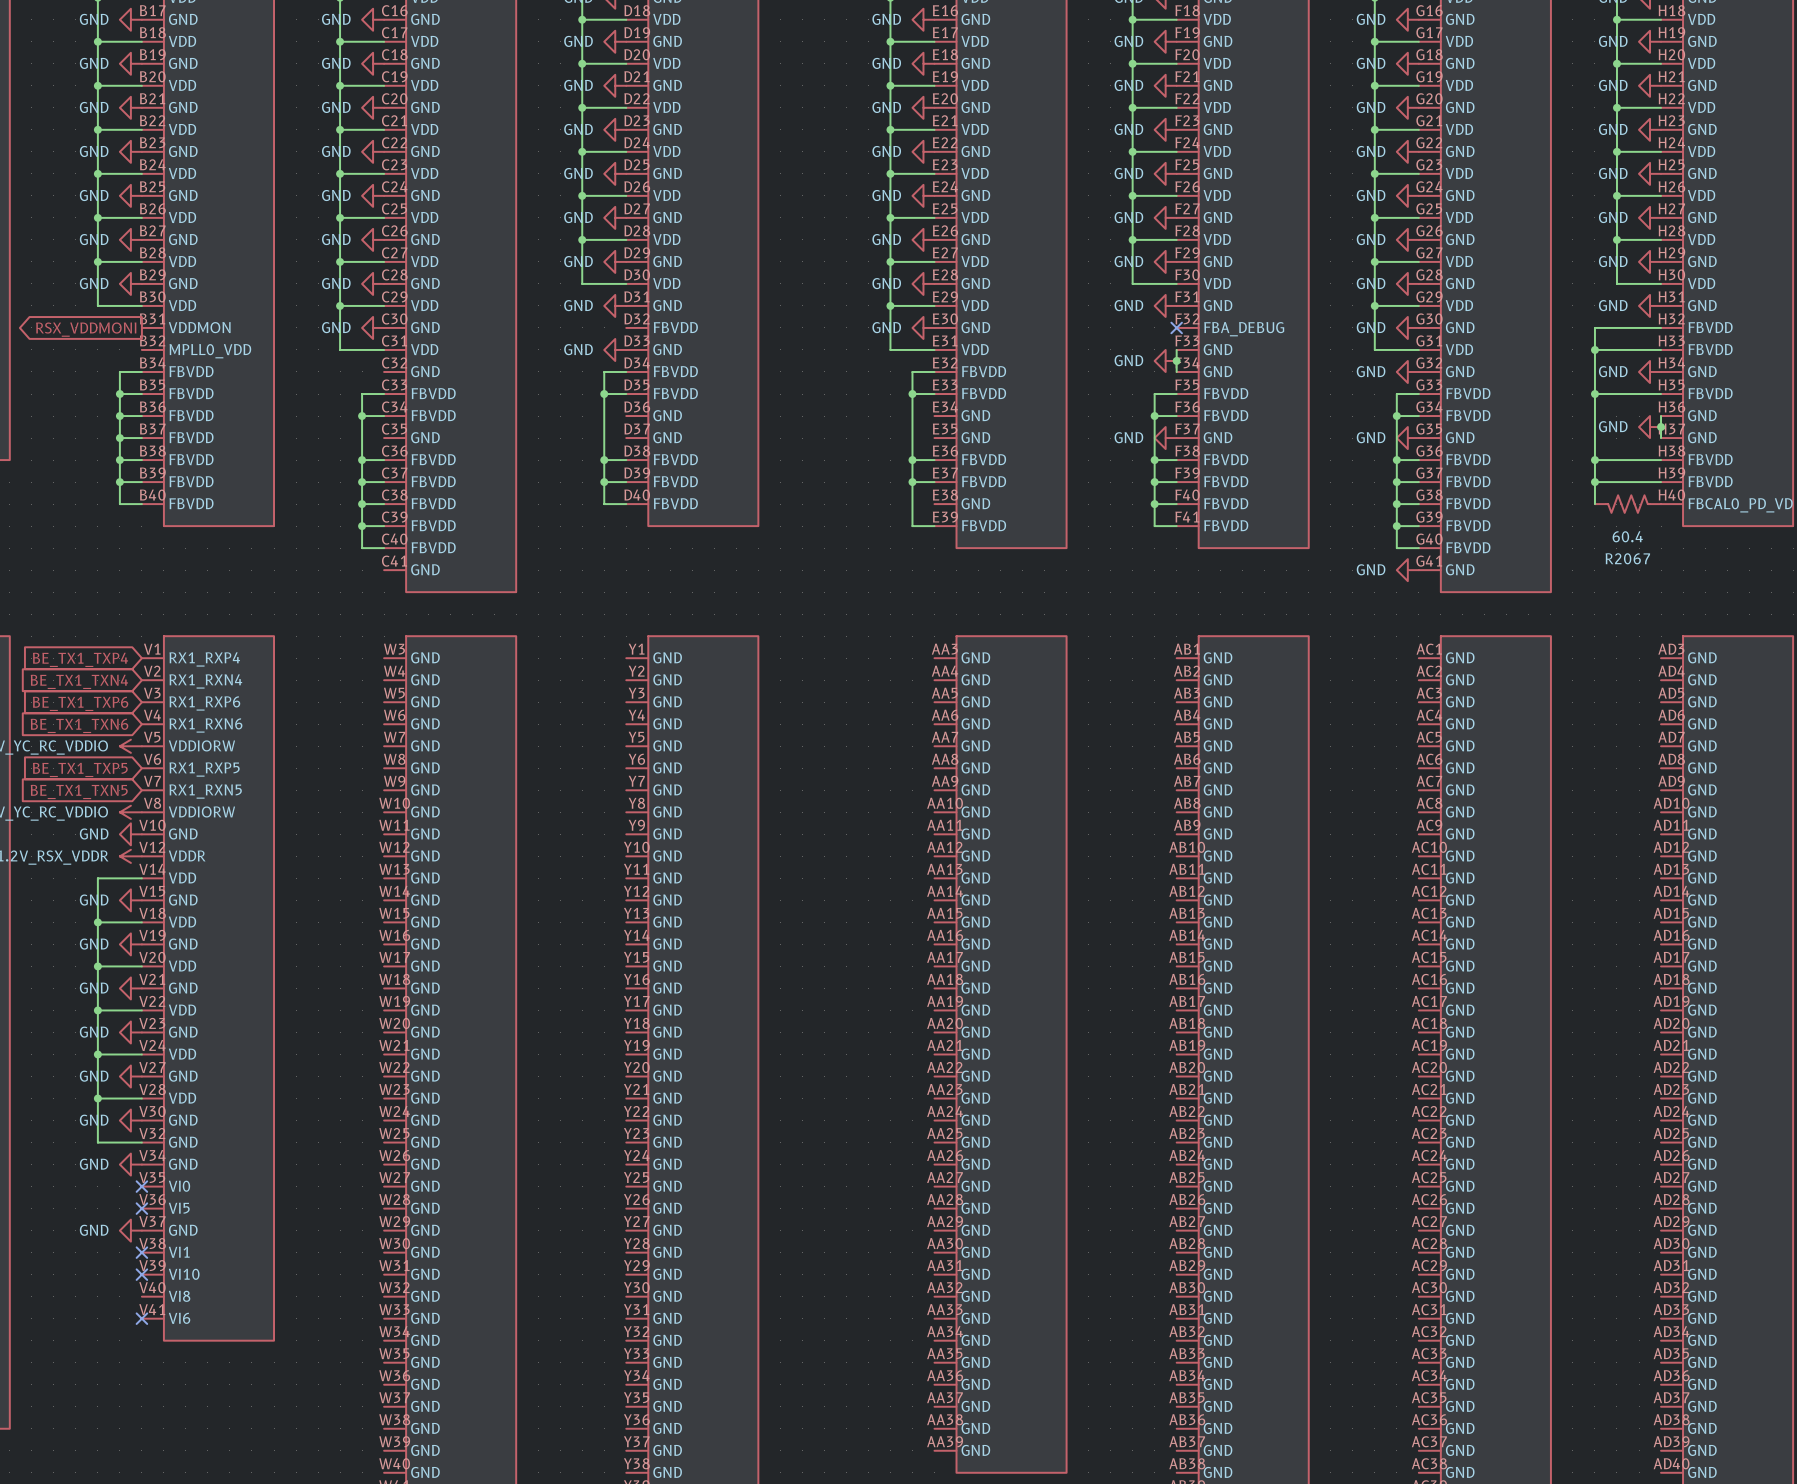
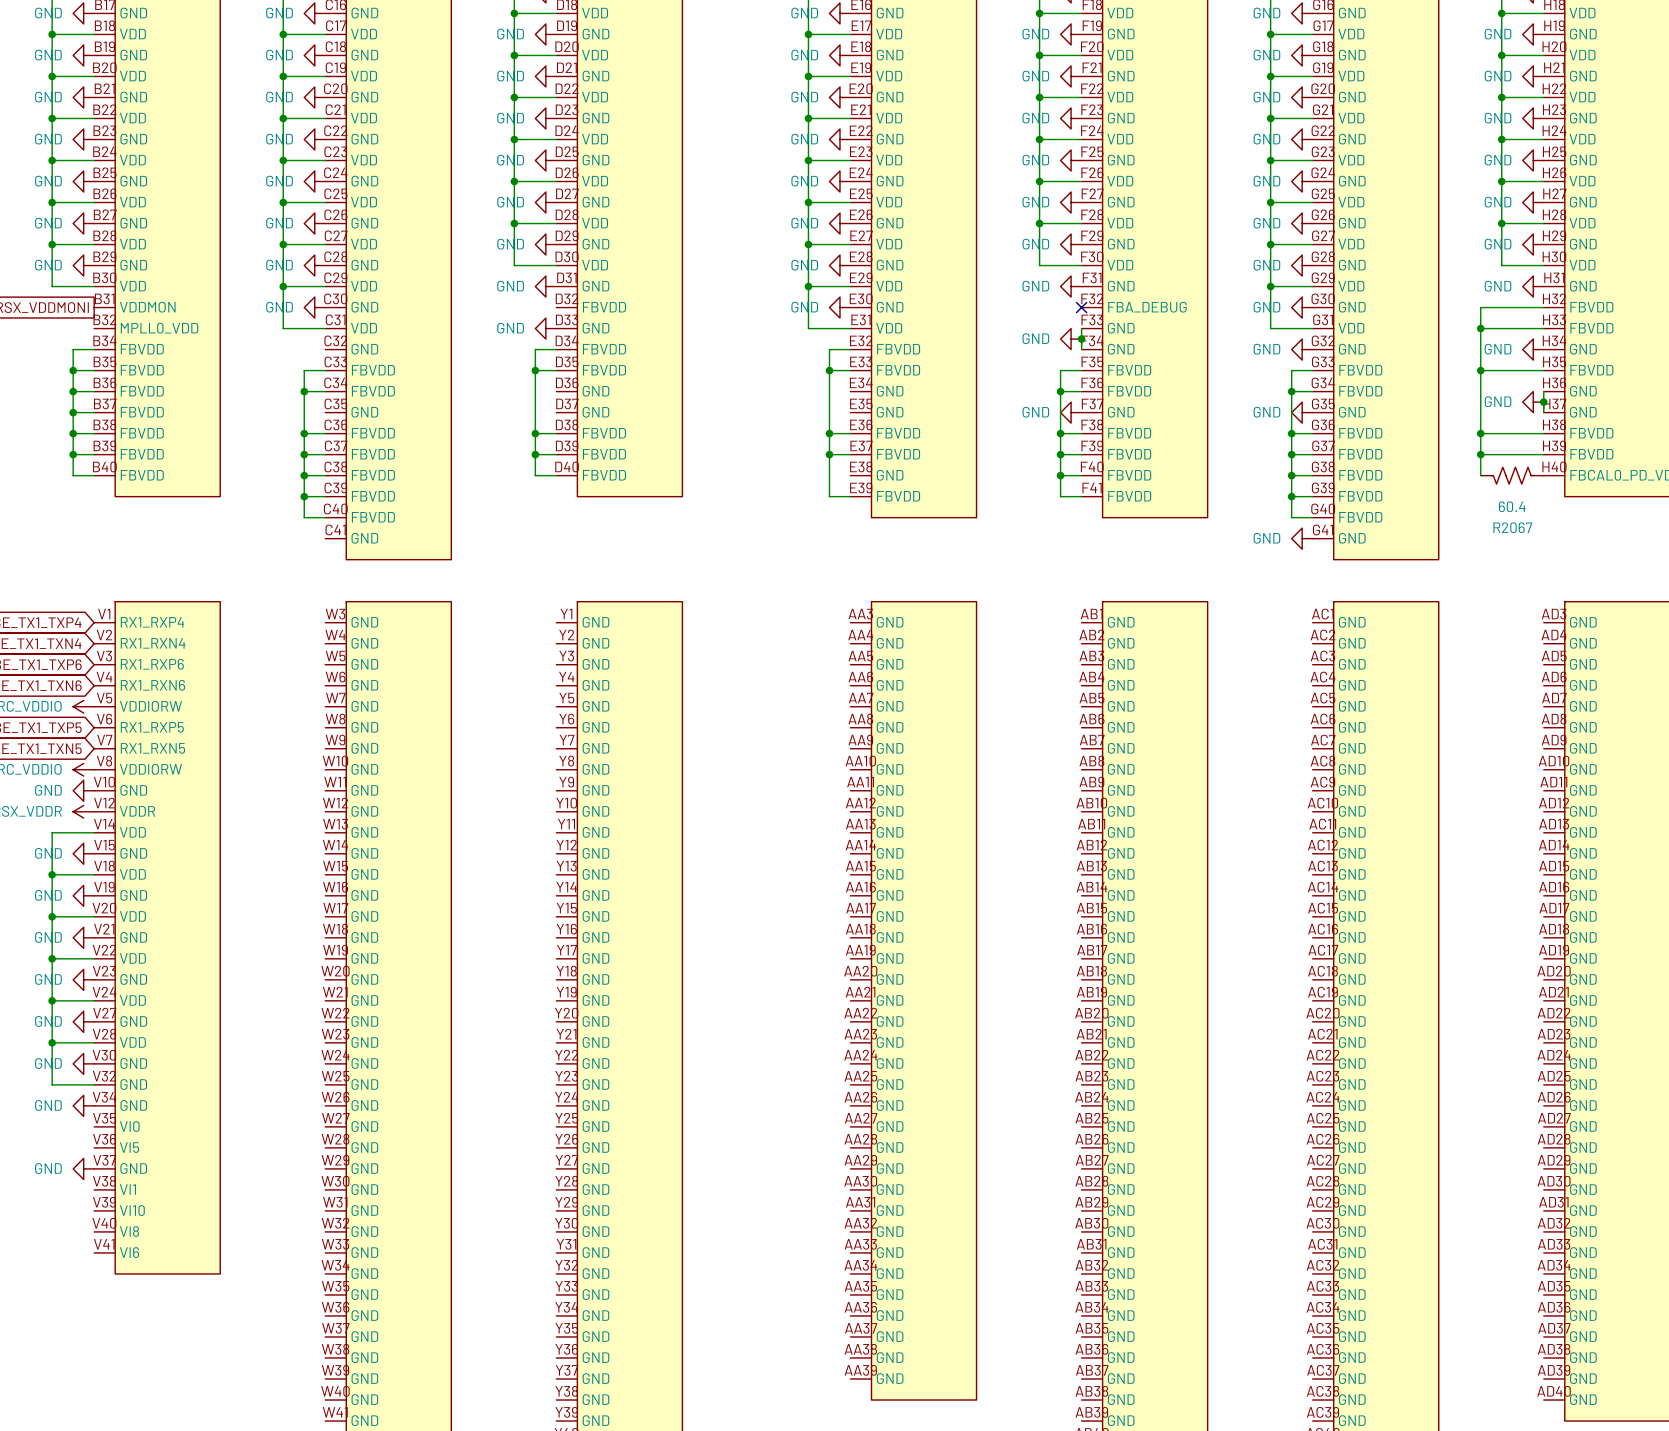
no-connect mark: (141, 1186) -> none
no-connect mark: (141, 1208) -> none
no-connect mark: (141, 1252) -> none
no-connect mark: (141, 1274) -> none
no-connect mark: (141, 1318) -> none

